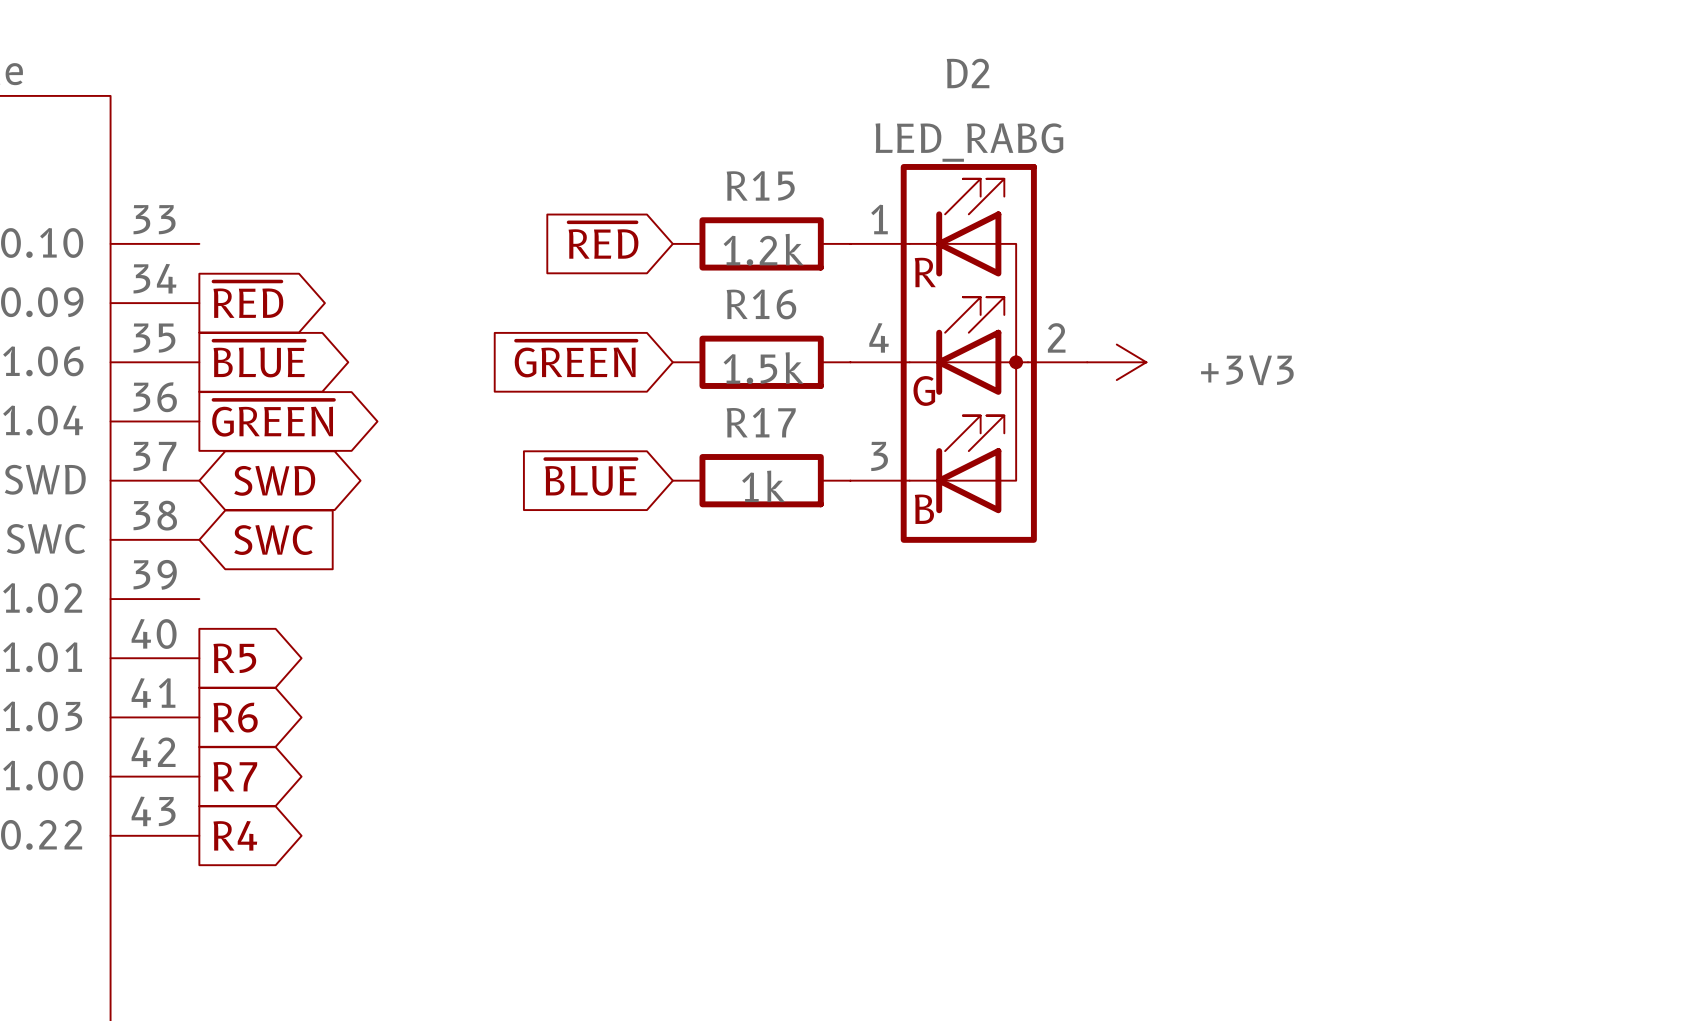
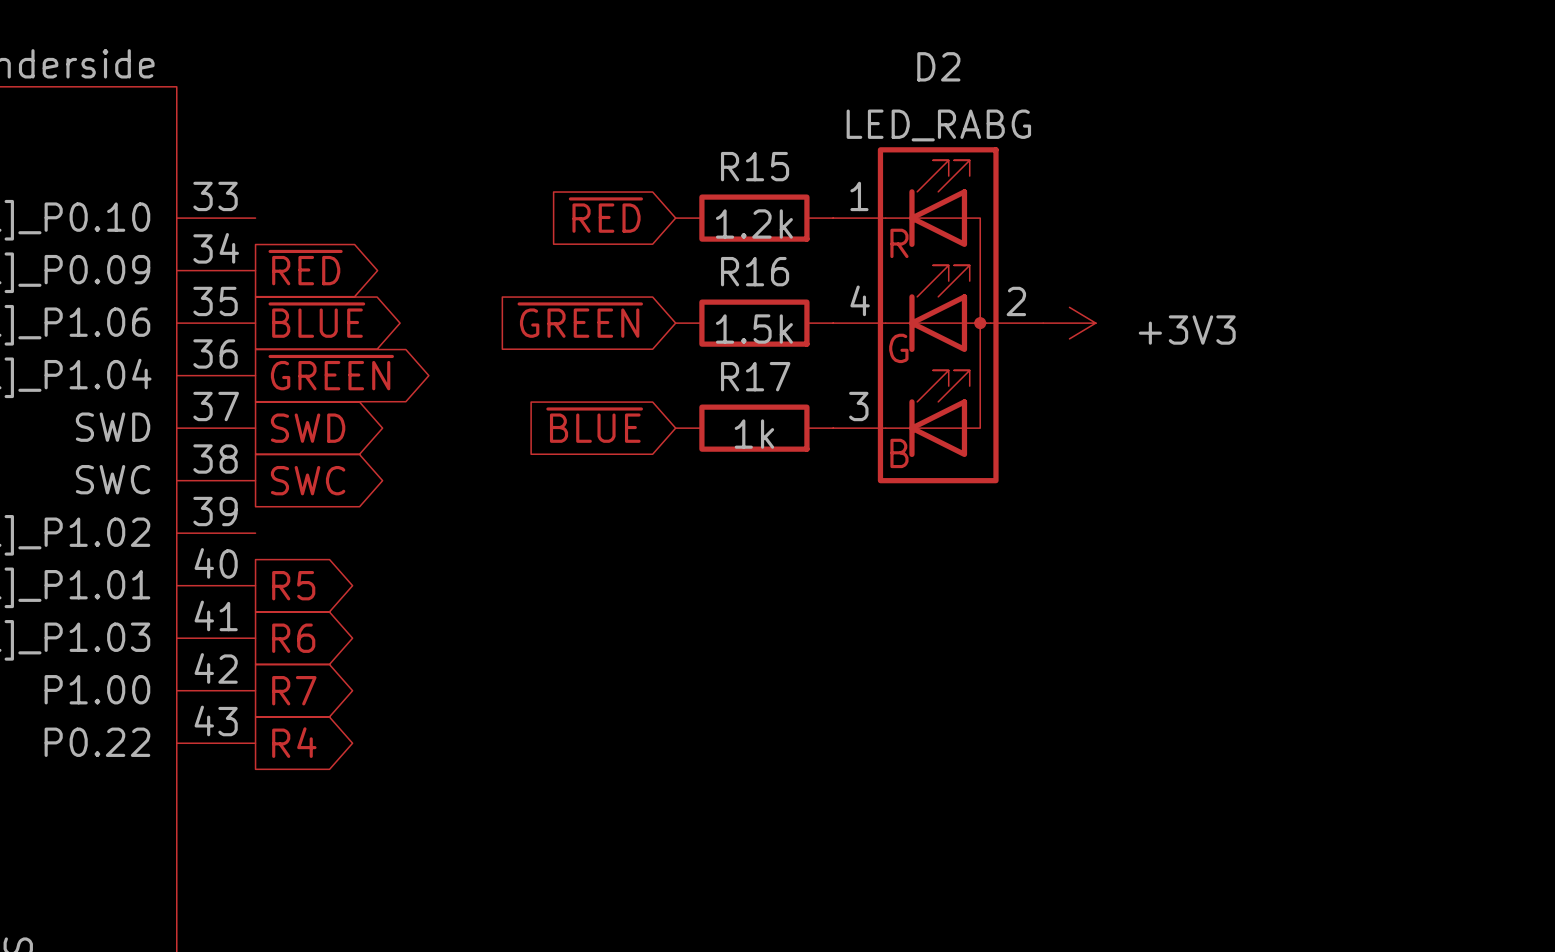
global label shape: bidirectional (274, 480) -> output (308, 428)
global label shape: input (273, 540) -> output (308, 480)

